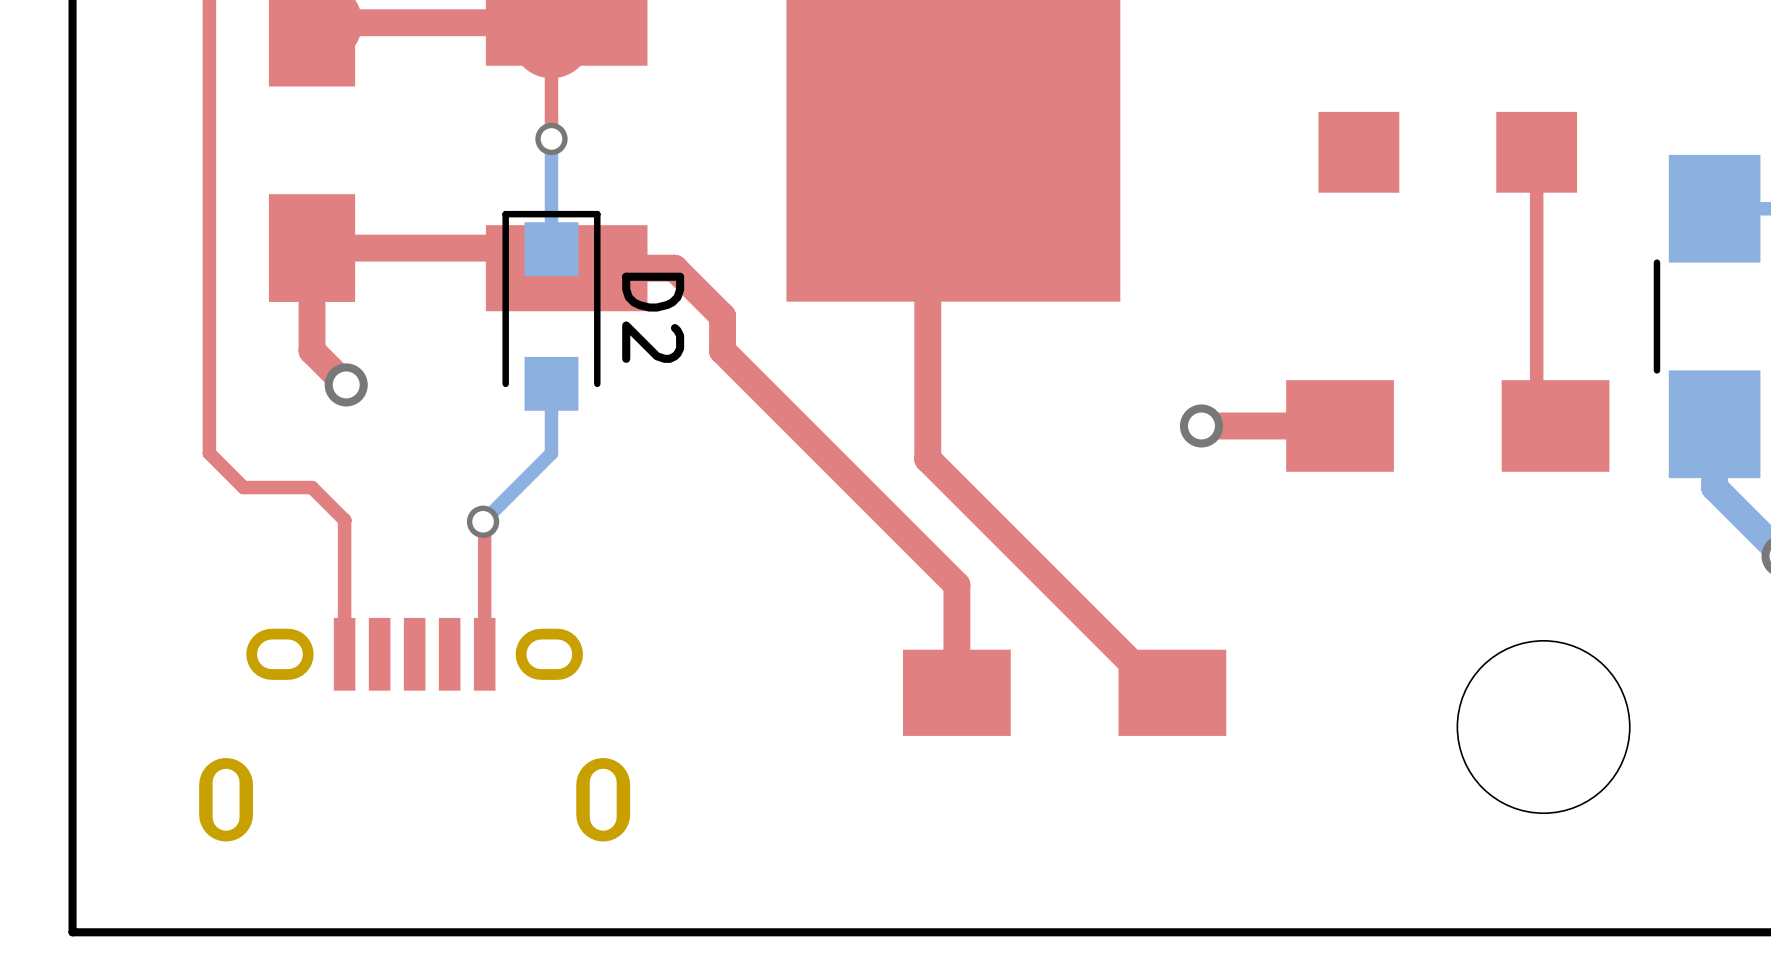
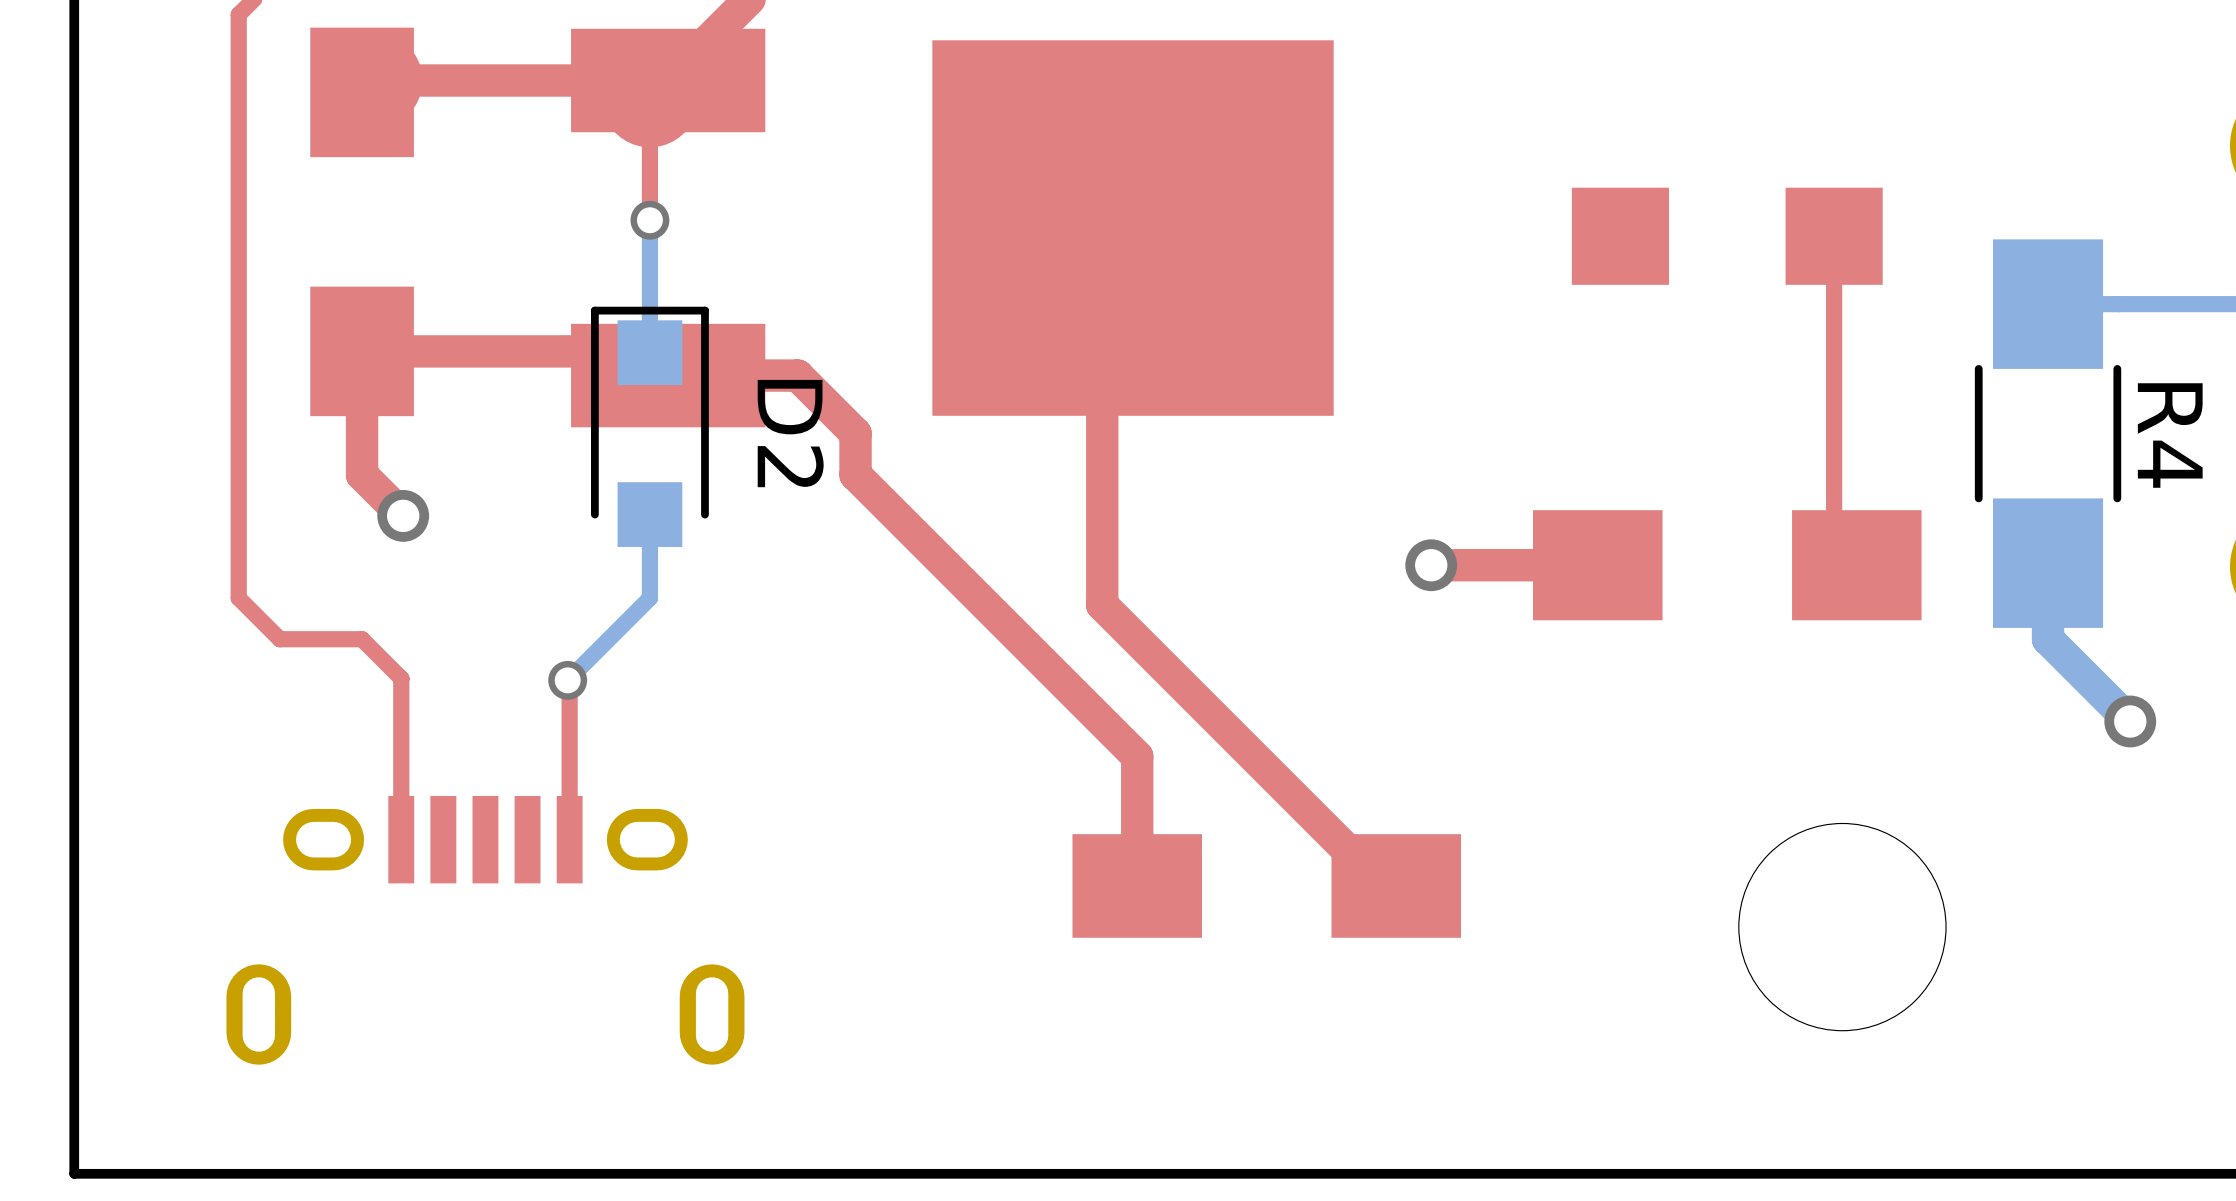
D2 name position: D2 (653, 317) -> D2 (790, 433)

